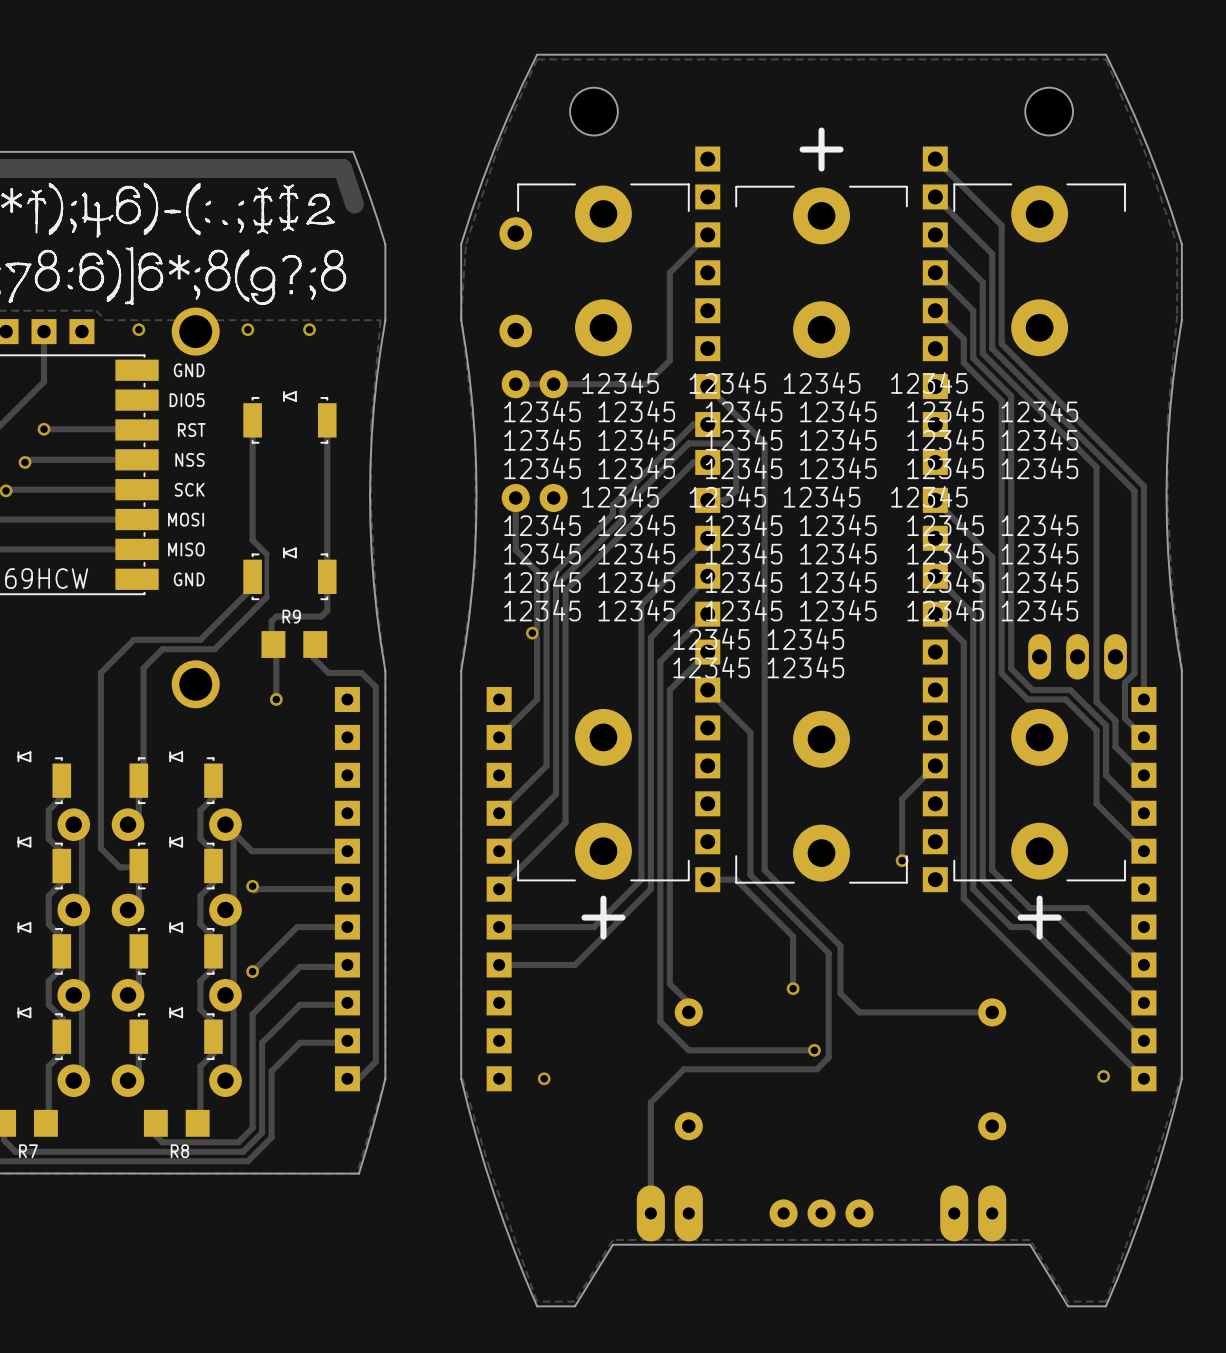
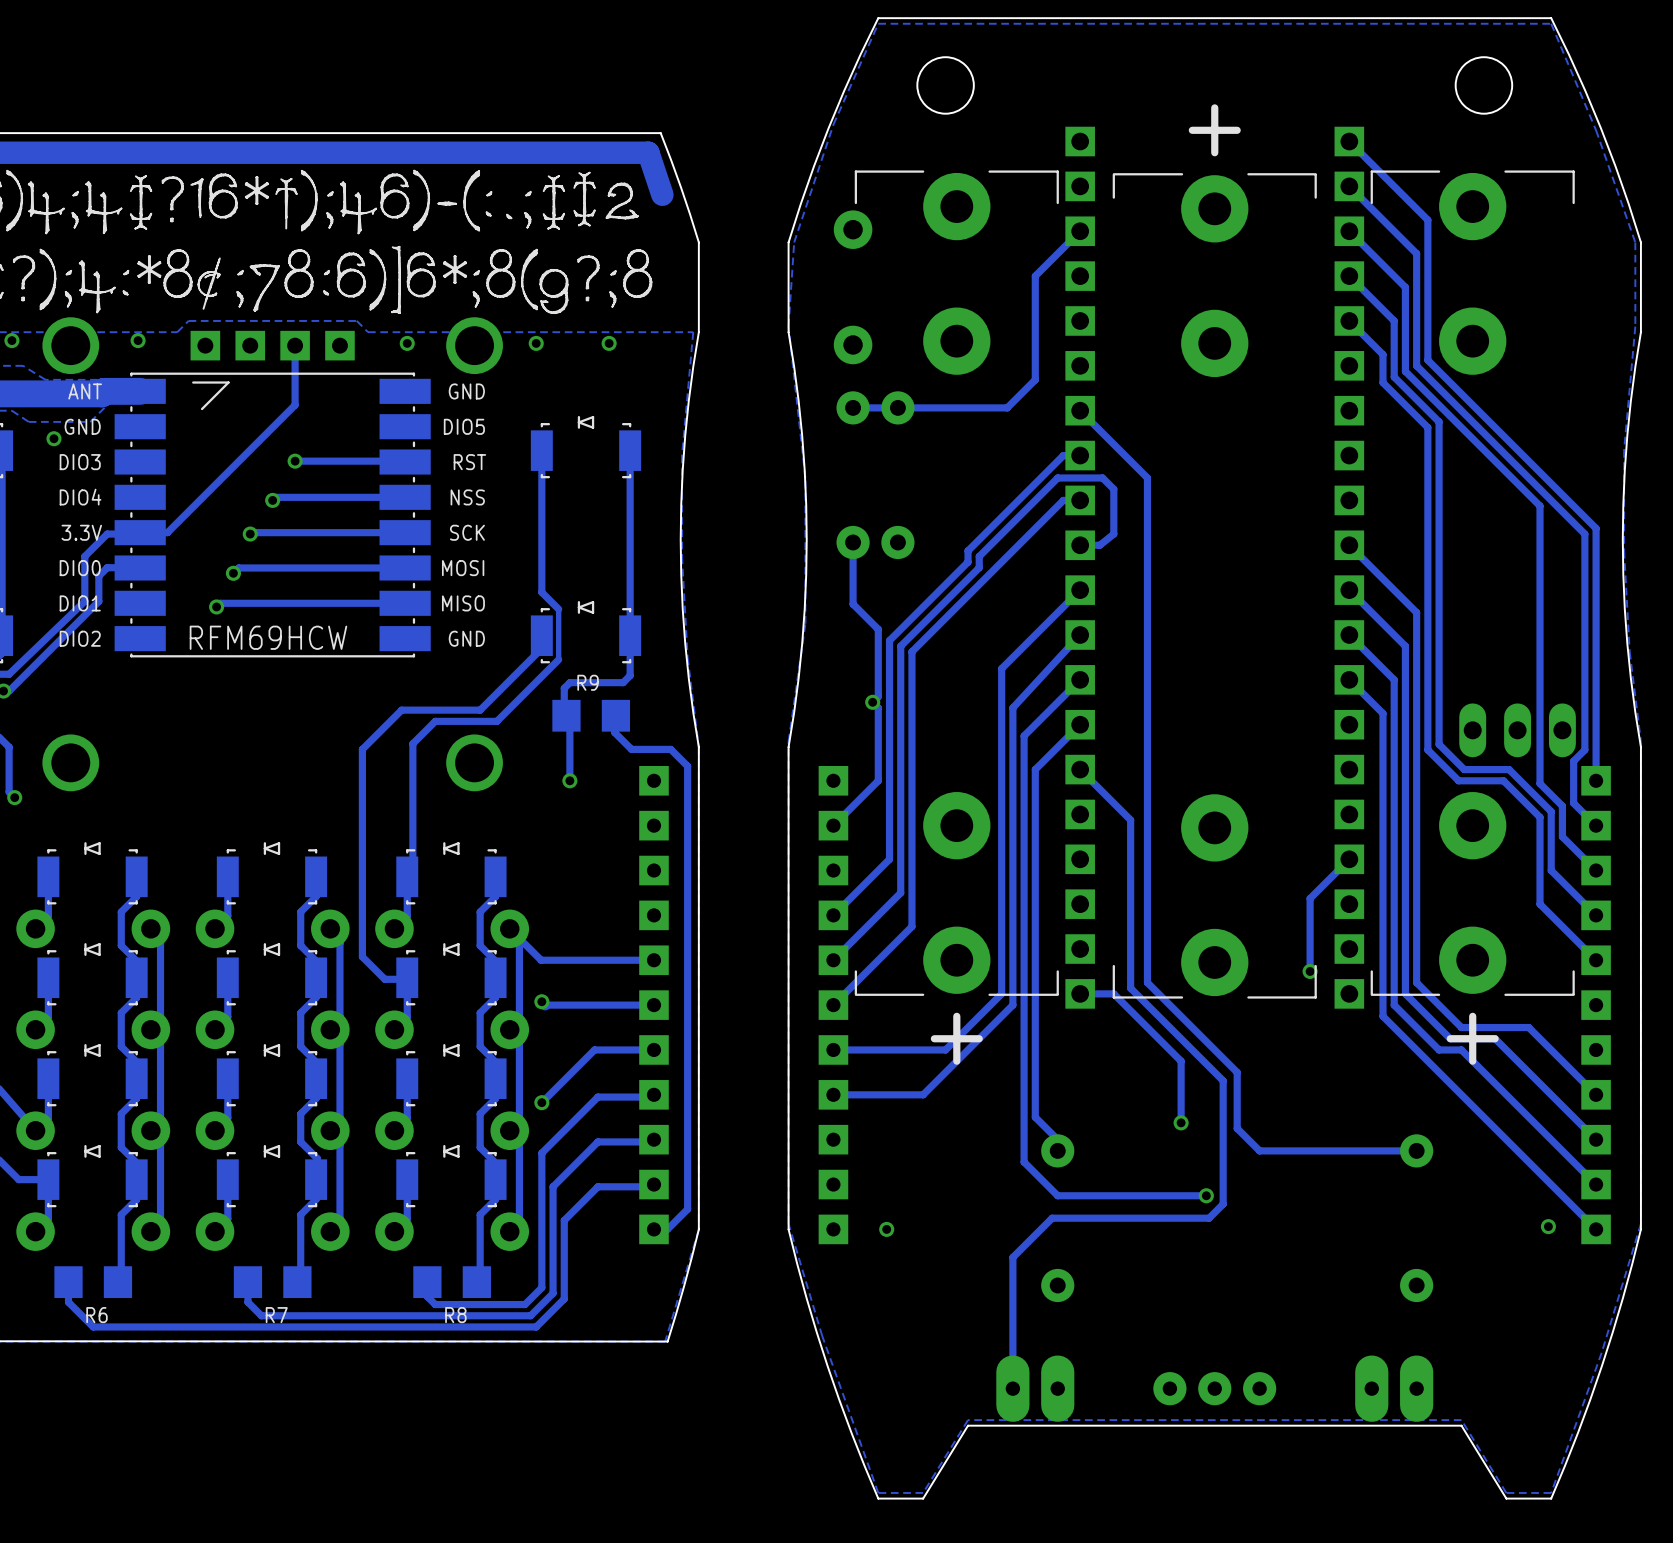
text: 12345 12345 12345 12345 (774, 382) -> none
text: 12345 12345 12345 12345 12345 12345 (791, 411) -> none
text: 12345 12345 12345 12345 12345 12345 (791, 439) -> none
text: 12345 12345 12345 12345 12345 12345 (791, 468) -> none
text: 12345 12345 12345 12345 (774, 496) -> none
text: 12345 12345 12345 12345 12345 12345 (791, 525) -> none
text: 12345 12345 12345 12345 12345 12345 (791, 553) -> none
text: 12345 12345 12345 12345 12345 12345 (791, 582) -> none
text: 12345 12345 12345 12345 12345 12345 (791, 610) -> none
text: 12345 12345 (758, 639) -> none
text: 12345 12345 (758, 667) -> none

